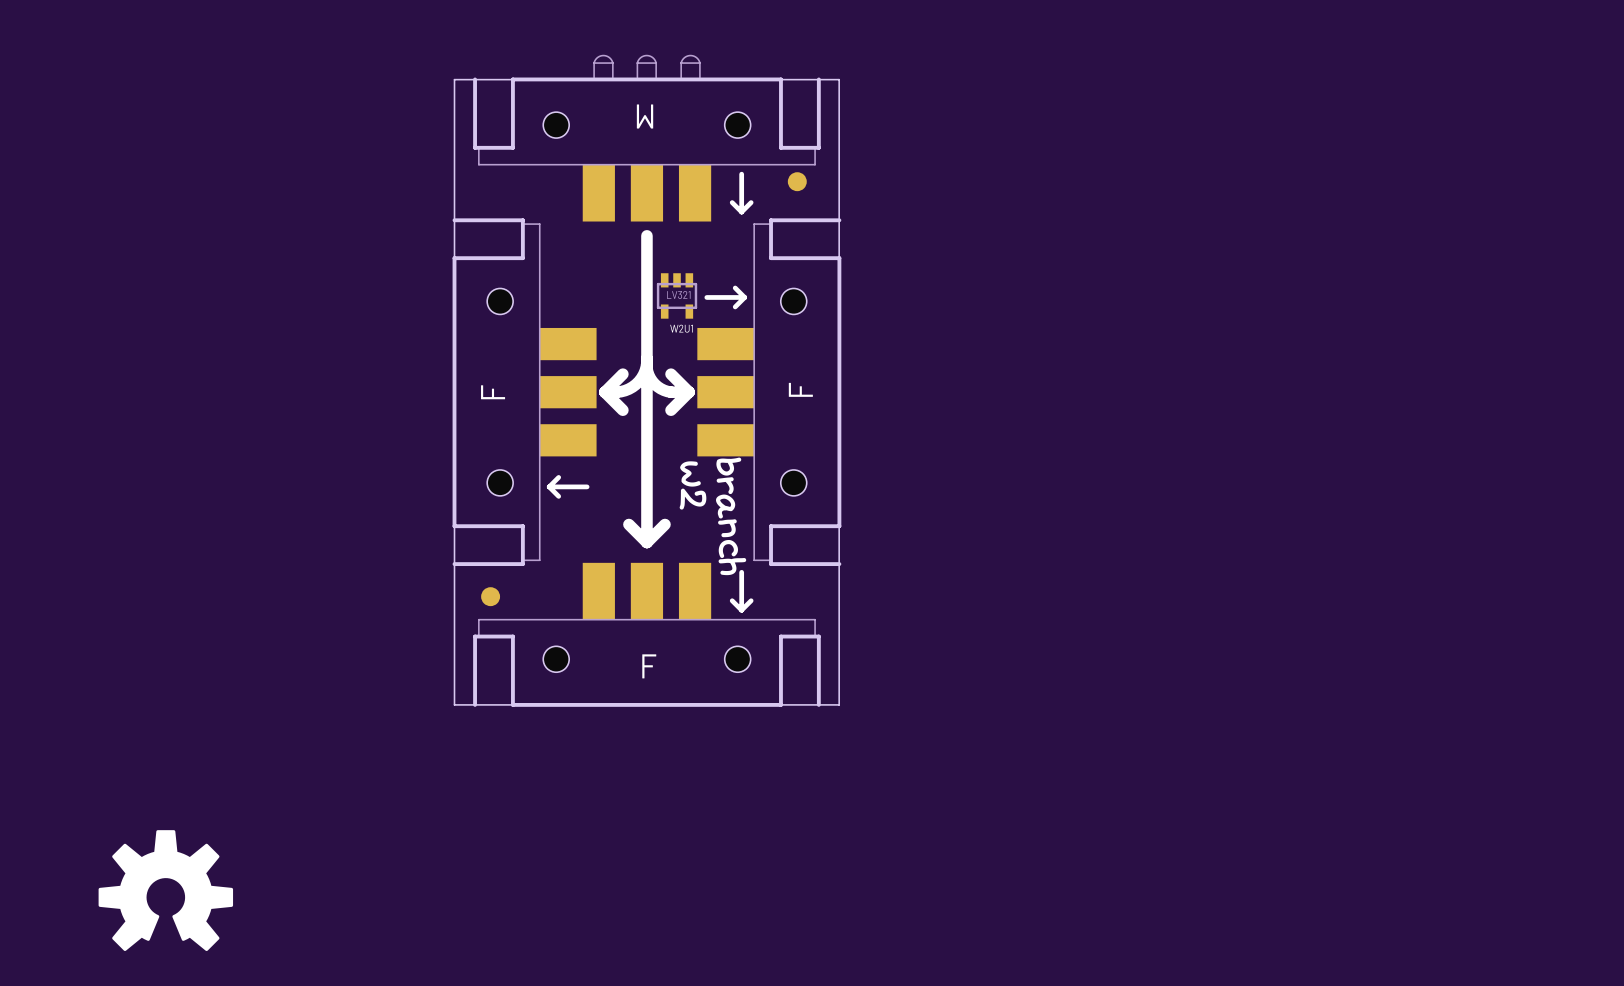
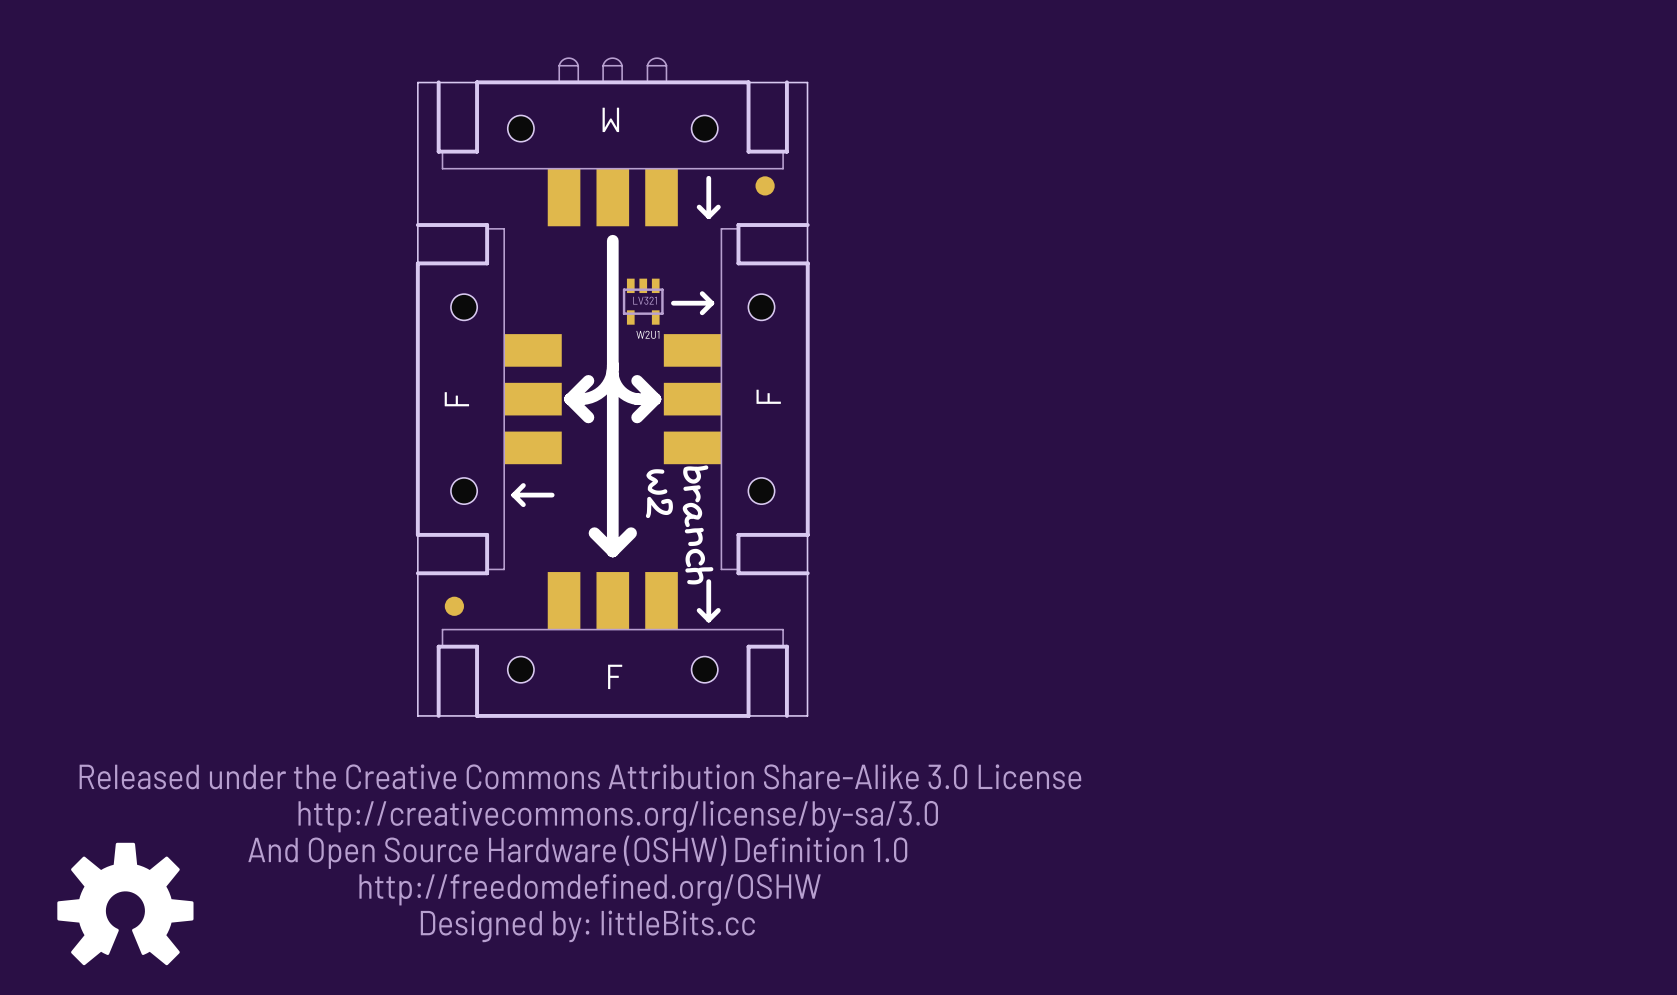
drawing: none -> [79, 764, 1082, 943]

